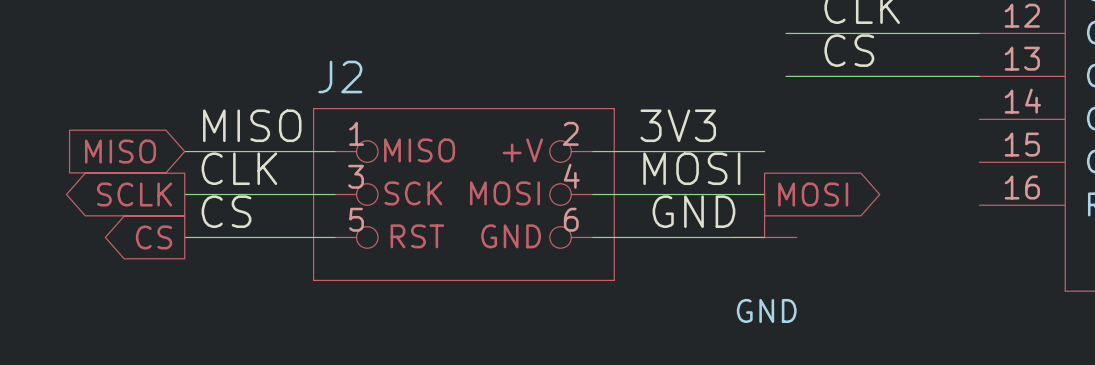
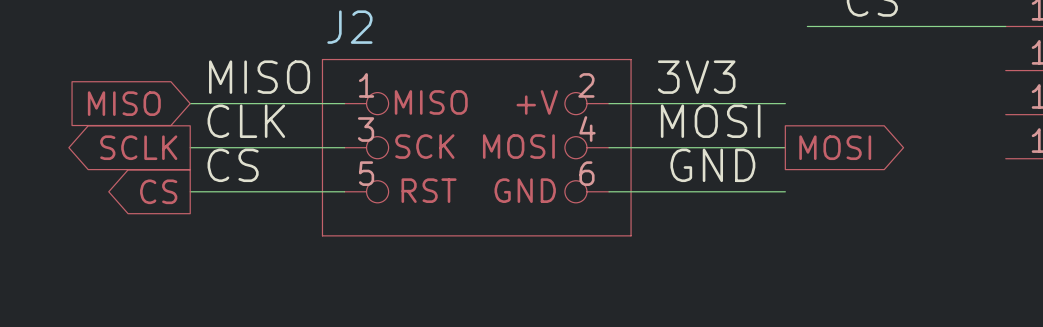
power symbol: GND (764, 215) -> none

